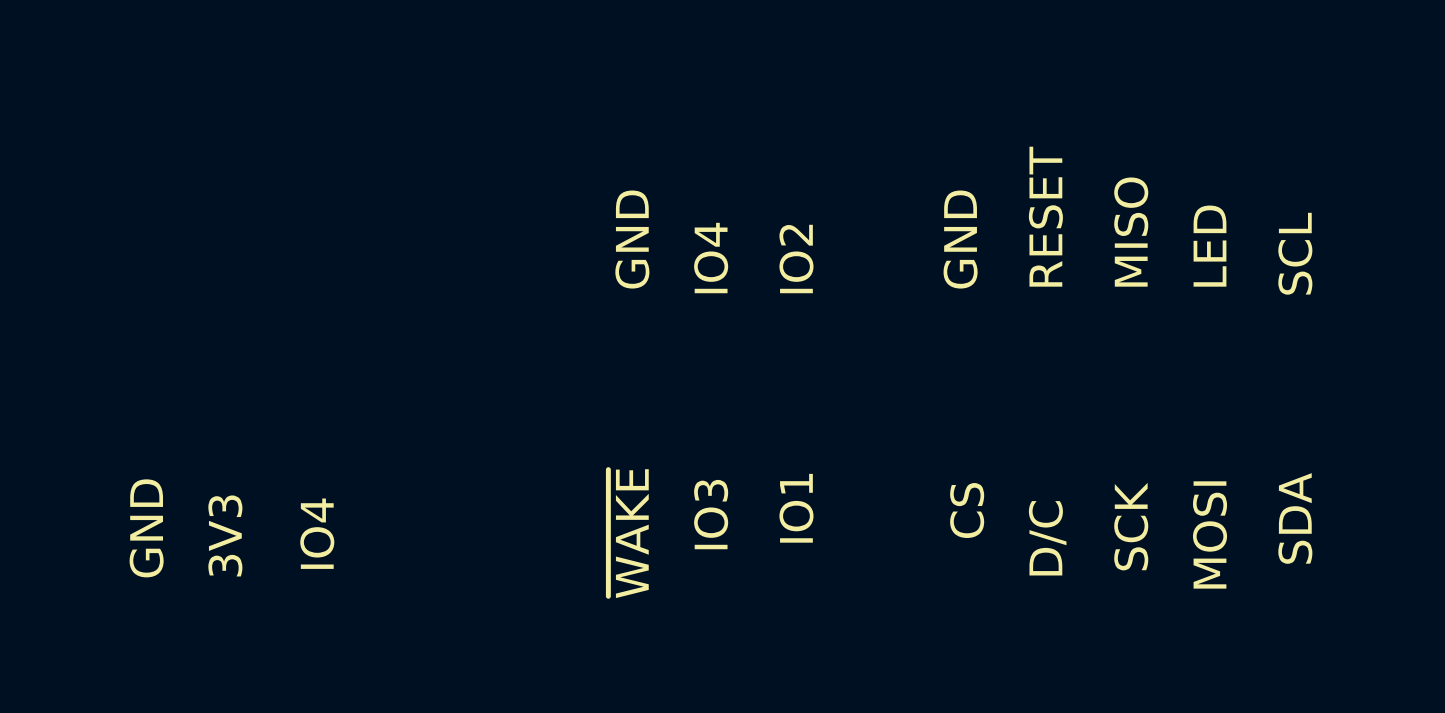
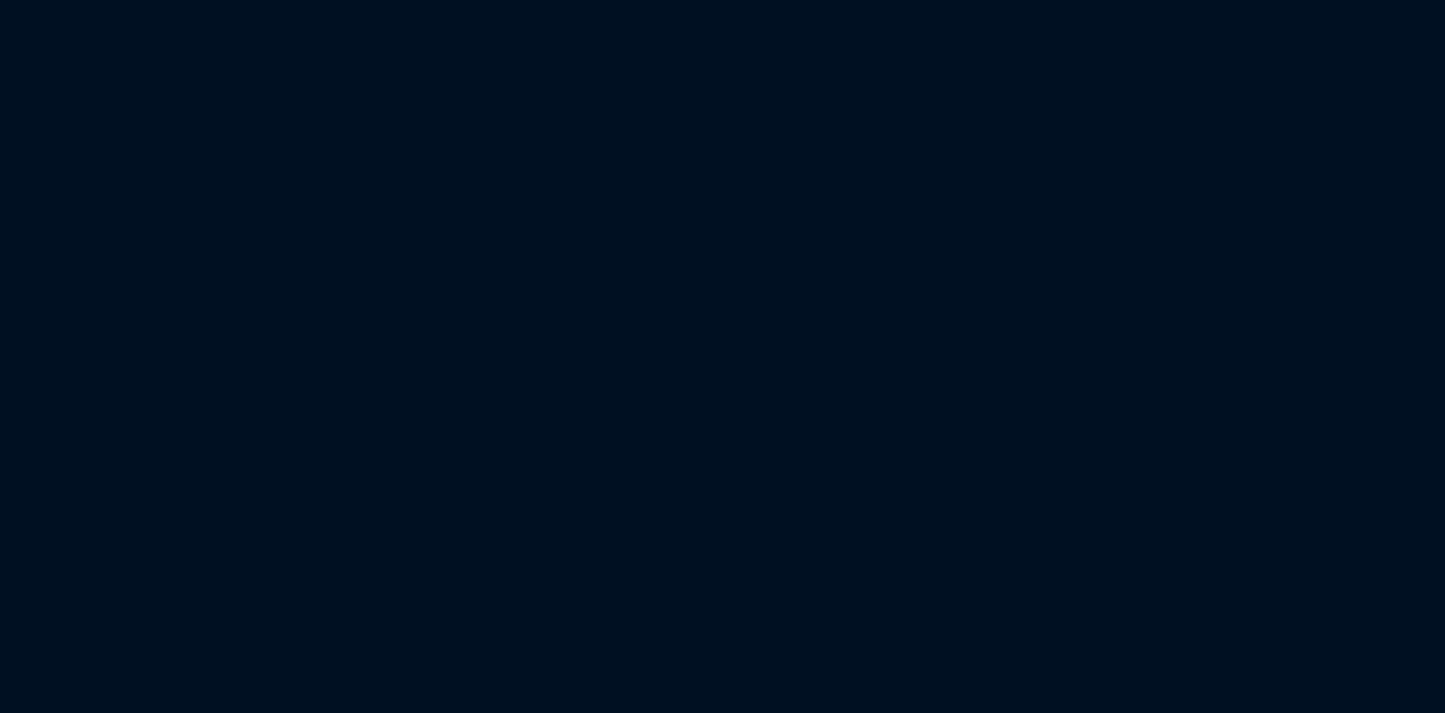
text: RESET (1045, 216) -> none
text: MISO (1131, 232) -> none
text: GND (632, 239) -> none
text: GND (960, 239) -> none
text: LED (1209, 246) -> none
text: SCL (1295, 253) -> none
text: IO4 (711, 258) -> none
text: IO2 (796, 259) -> none
text: IO1 (796, 508) -> none
text: CS (967, 510) -> none
text: IO3 (711, 514) -> none
text: SDA (1295, 518) -> none
text: SCK (1131, 526) -> none
text: GND (146, 528) -> none
text: IO4 (317, 533) -> none
text: ~{WAKE} (628, 533) -> none
text: MOSI (1210, 534) -> none
text: 3V3 (225, 535) -> none
text: D/C (1047, 538) -> none

